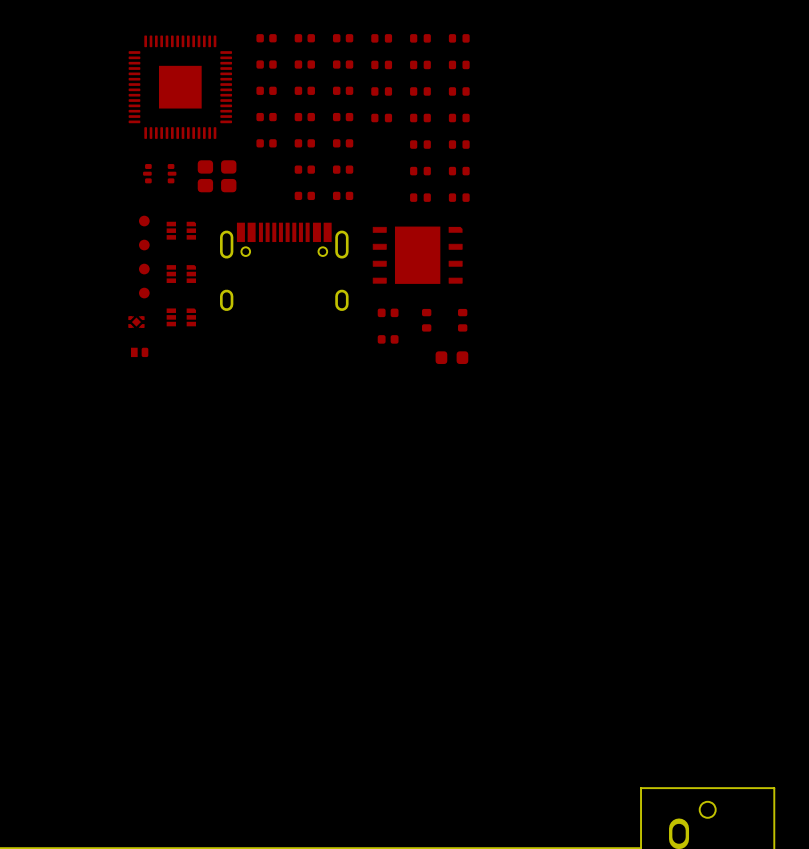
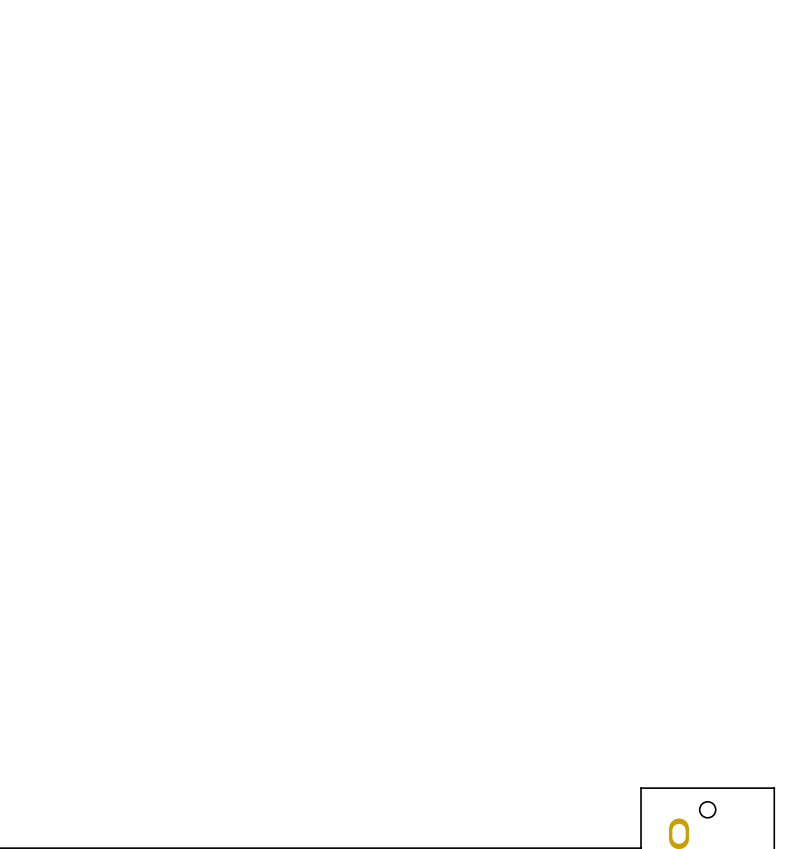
part: (266, 38) -> none
part: (304, 38) -> none
part: (343, 38) -> none
part: (381, 38) -> none
part: (420, 38) -> none
part: (459, 38) -> none
part: (266, 64) -> none
part: (304, 64) -> none
part: (343, 64) -> none
part: (381, 64) -> none
part: (420, 64) -> none
part: (459, 64) -> none
part: (180, 87) -> none
part: (266, 90) -> none
part: (304, 90) -> none
part: (343, 90) -> none
part: (381, 91) -> none
part: (420, 91) -> none
part: (459, 91) -> none
part: (266, 117) -> none
part: (304, 117) -> none
part: (343, 117) -> none
part: (381, 118) -> none
part: (420, 118) -> none
part: (459, 118) -> none
part: (266, 143) -> none
part: (304, 143) -> none
part: (343, 143) -> none
part: (420, 144) -> none
part: (459, 144) -> none
part: (304, 169) -> none
part: (343, 169) -> none
part: (420, 171) -> none
part: (459, 171) -> none
part: (159, 173) -> none
part: (217, 176) -> none
part: (304, 195) -> none
part: (343, 195) -> none
part: (420, 197) -> none
part: (459, 197) -> none
part: (144, 221) -> none
part: (181, 230) -> none
part: (144, 245) -> none
part: (417, 255) -> none
part: (284, 266) -> none
part: (144, 269) -> none
part: (181, 274) -> none
part: (144, 293) -> none
part: (388, 312) -> none
part: (181, 317) -> none
part: (444, 320) -> none
part: (136, 322) -> none
part: (388, 339) -> none
part: (139, 352) -> none
part: (451, 357) -> none

